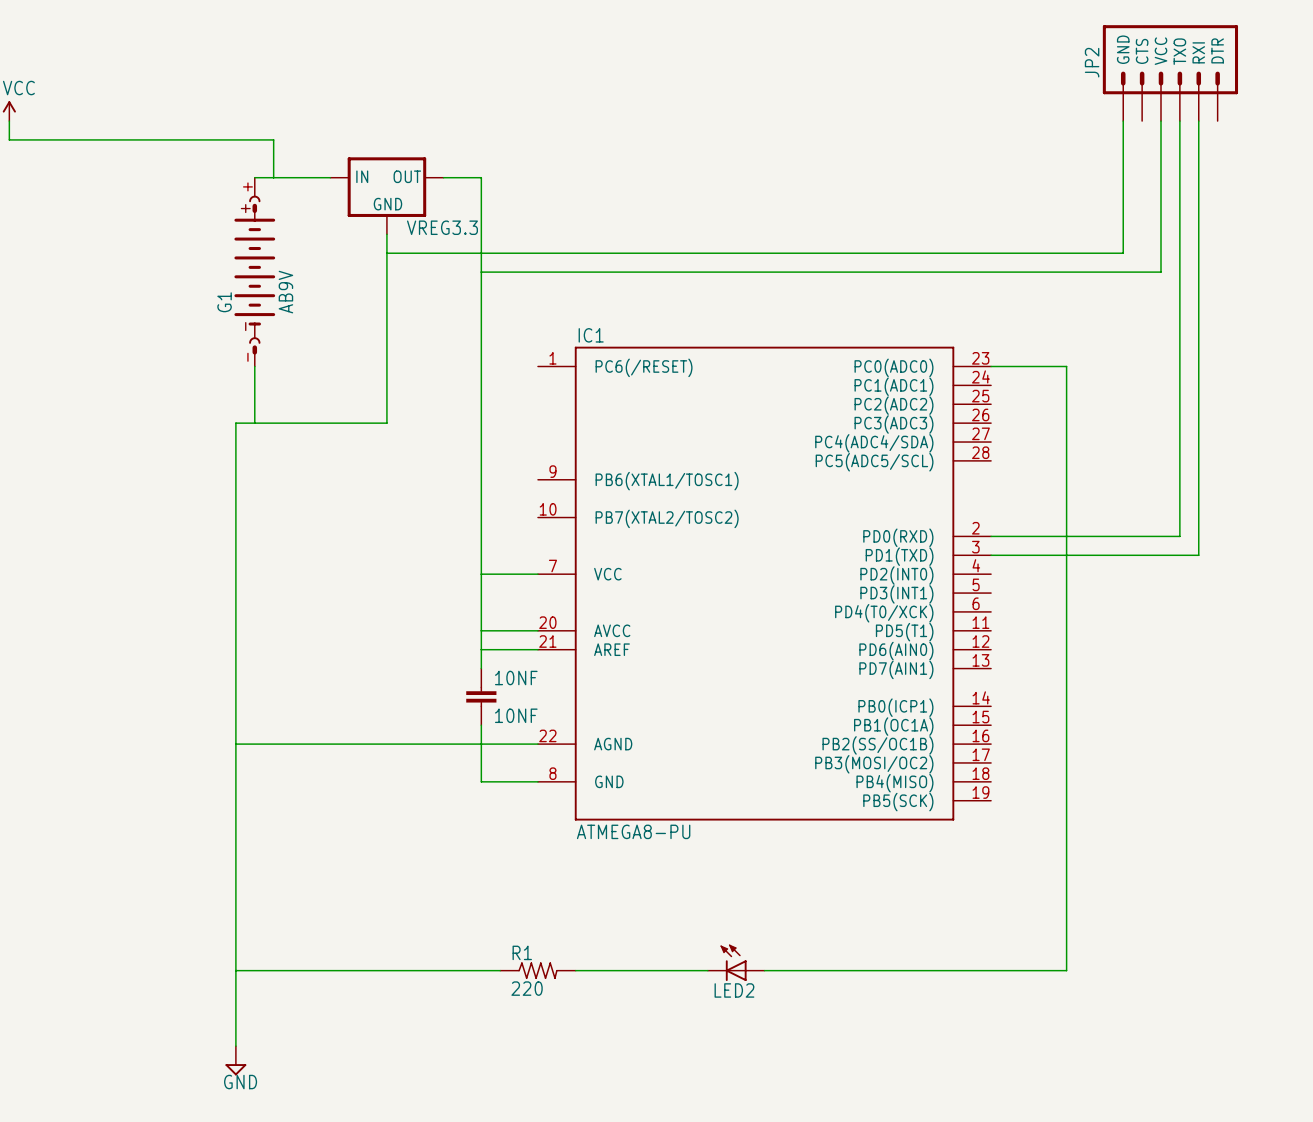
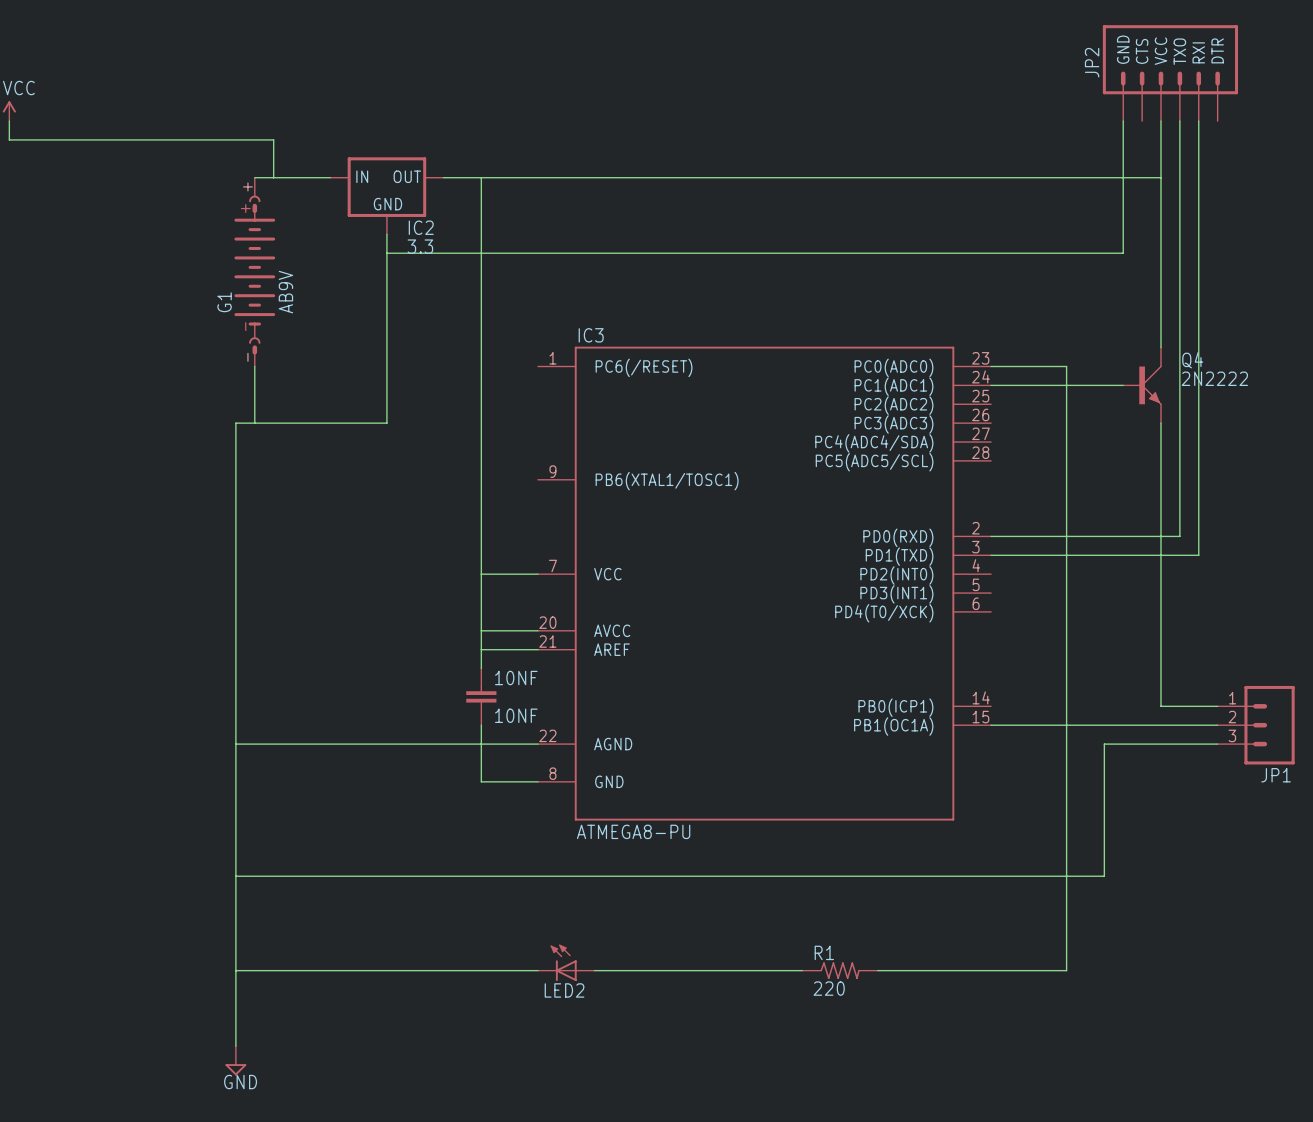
wire: none -> (481, 177) (1161, 177)
VREG3.3 name: VREG3.3 (442, 227) -> IC2 (421, 227)
VREG3.3 value: none -> 3.3 (420, 246)
wire: (481, 272) (1161, 272) -> (1161, 347) (1161, 272)
wire: none -> (991, 385) (1123, 385)
Q4: none -> 2N2222 (1142, 385)
wire: none -> (1161, 423) (1161, 706) (1217, 706)
IC1: ATMEGA8-PU (764, 583) -> none
IC3: none -> ATMEGA8-PU (764, 583)
wire: none -> (991, 725) (1217, 725)
JP1: none -> (1256, 725)
wire: none -> (1217, 744) (1104, 744) (1104, 876) (235, 876)
LED2 position: (736, 962) -> (566, 962)
R1 position: (537, 970) -> (840, 970)

